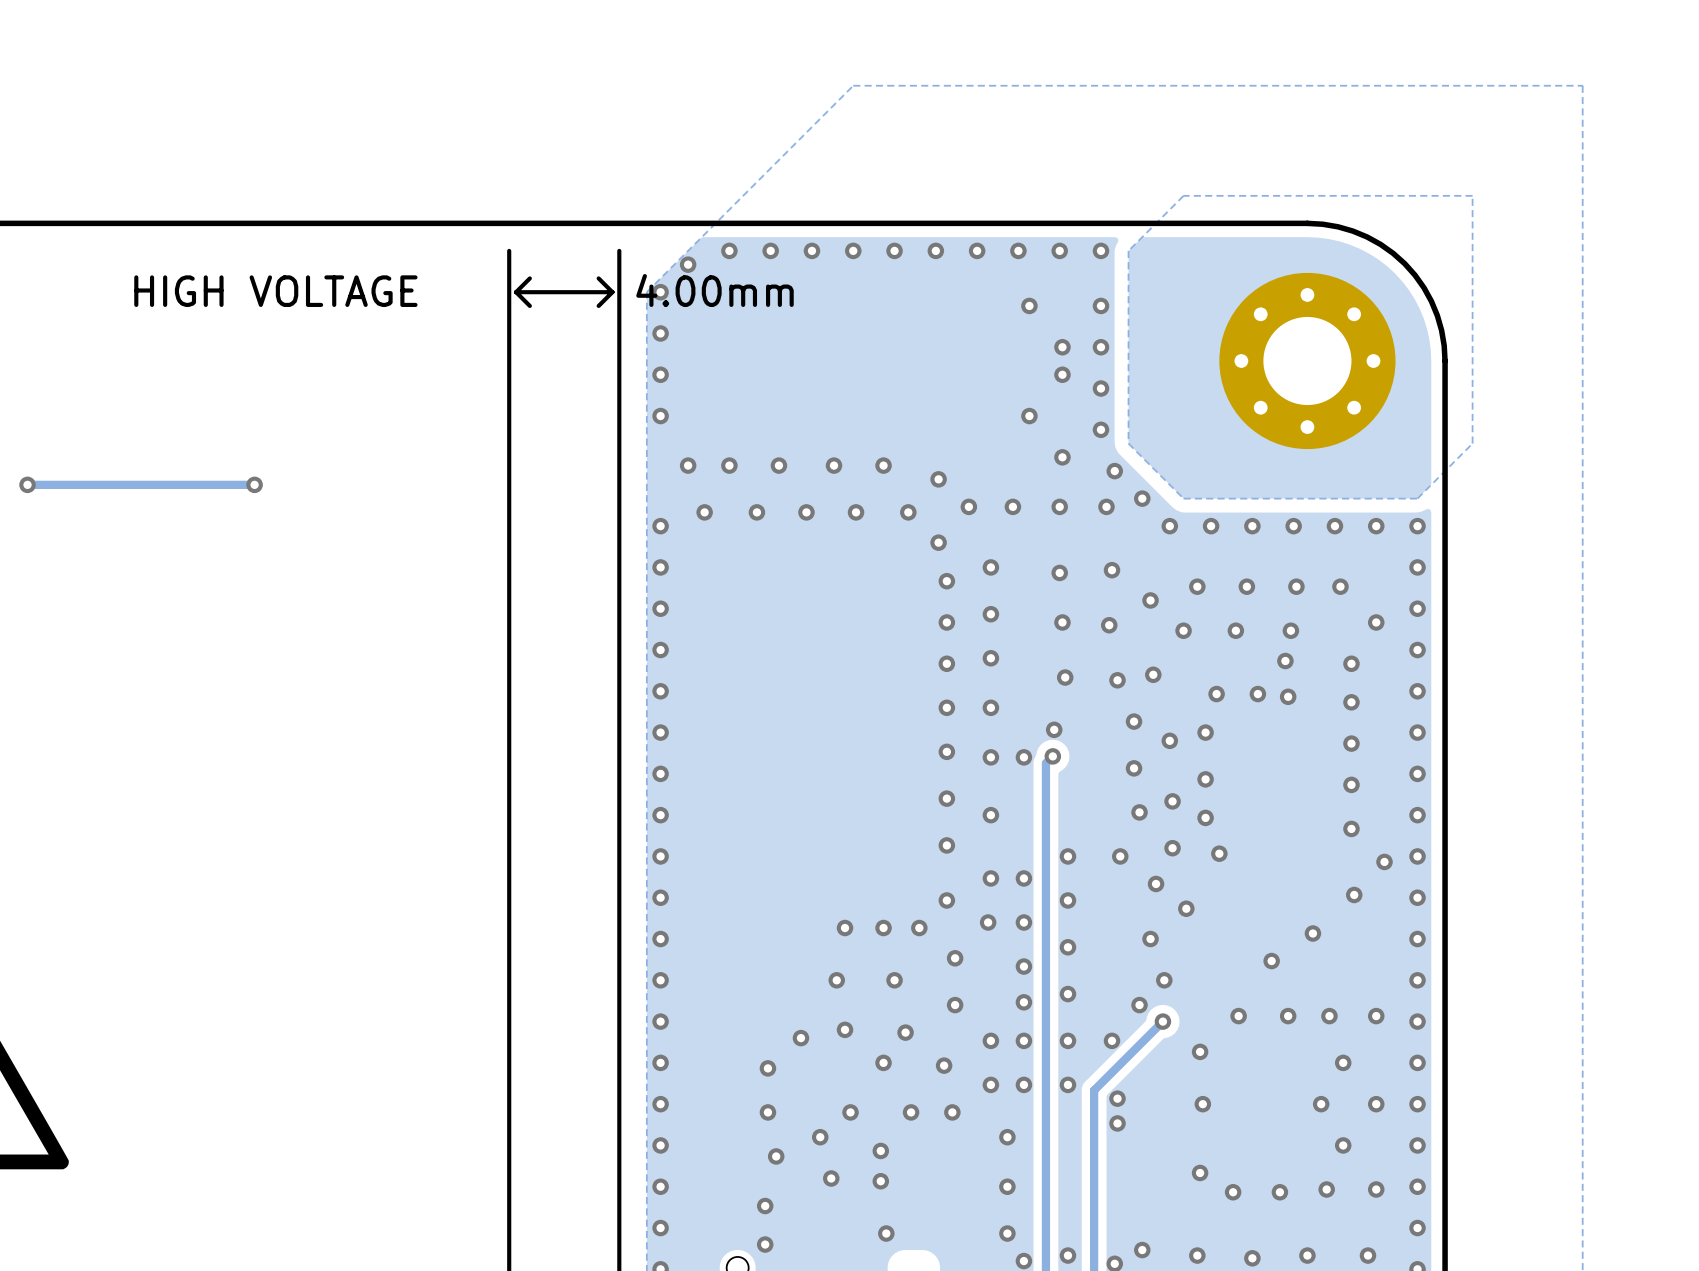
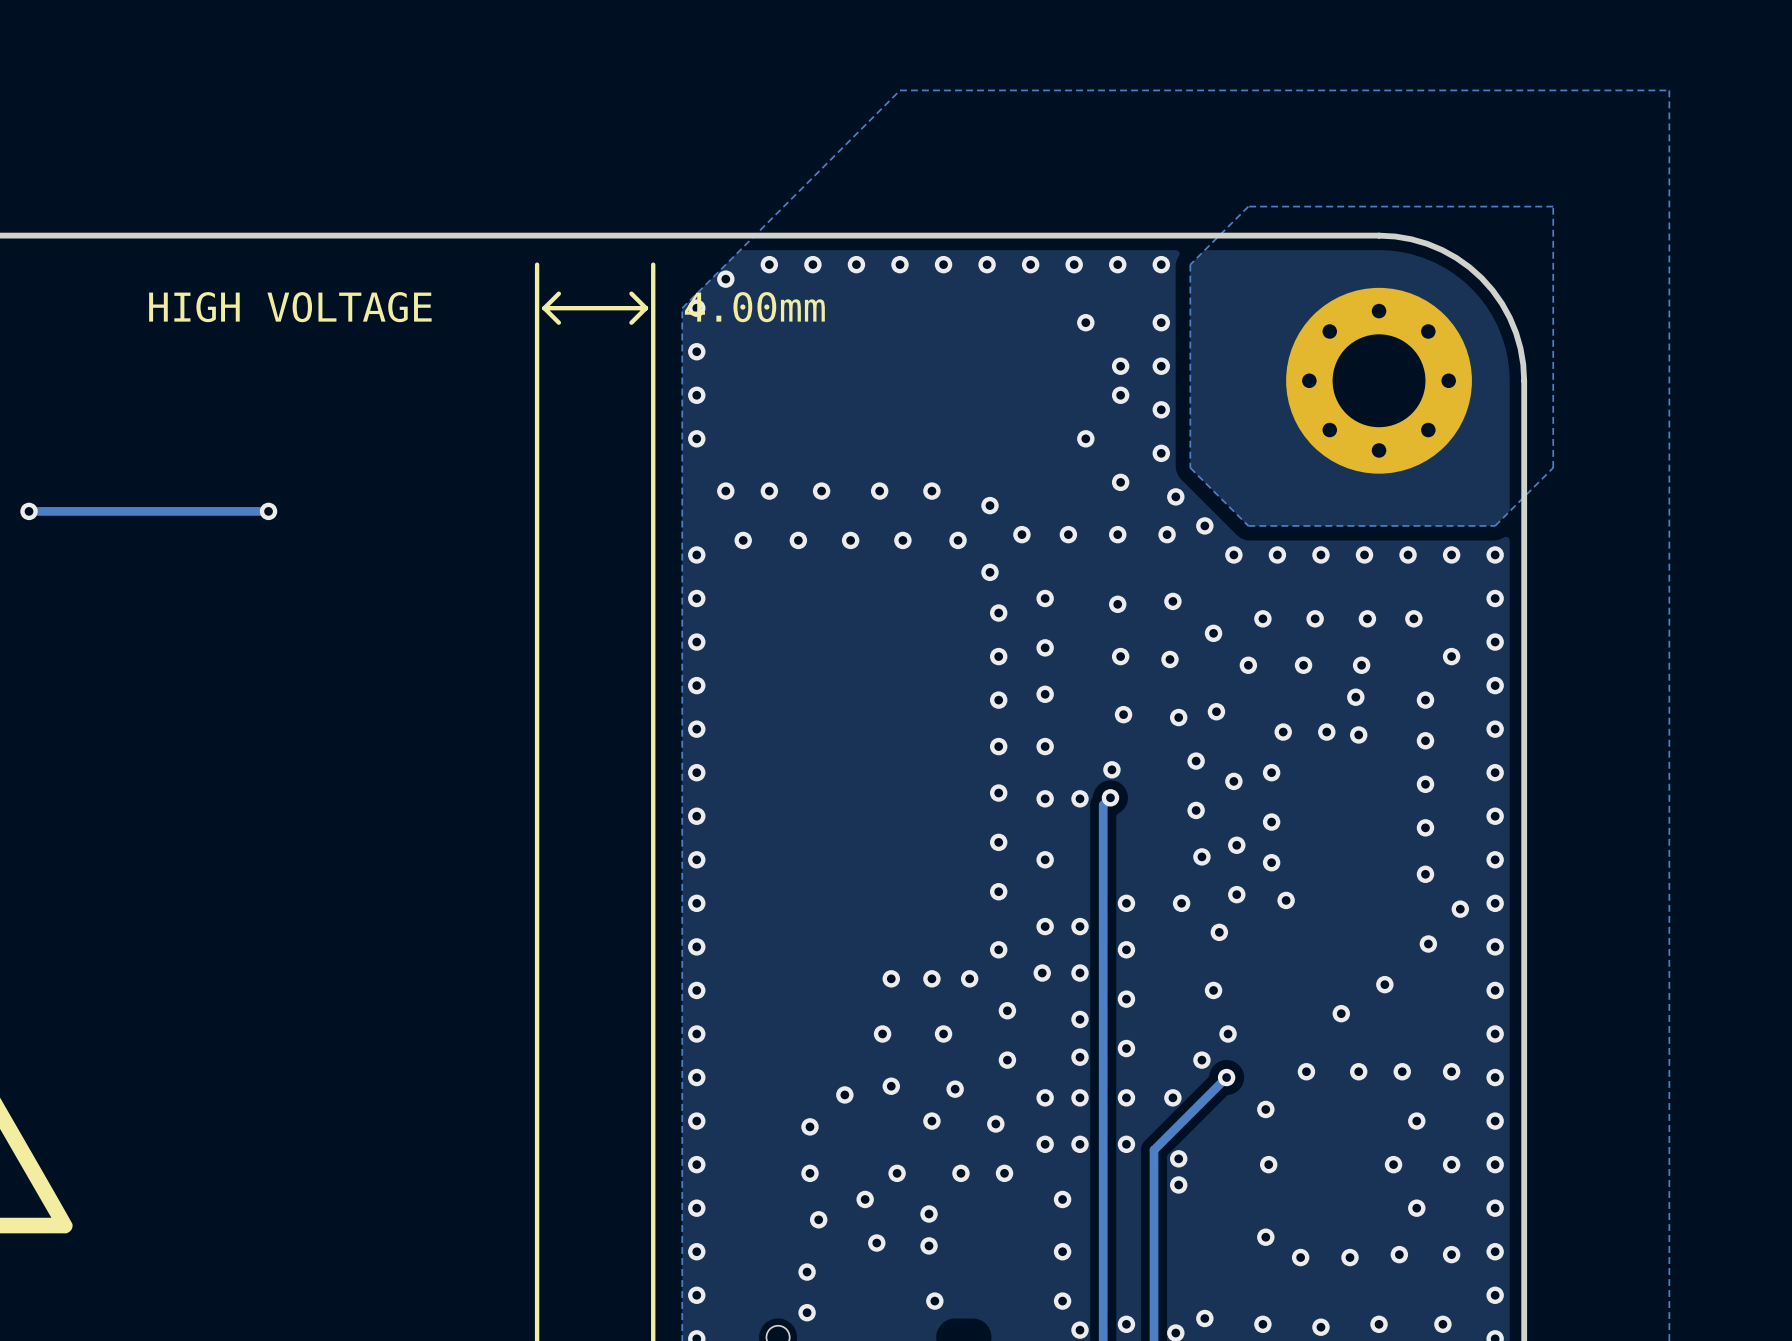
via: (1186, 908) -> none

